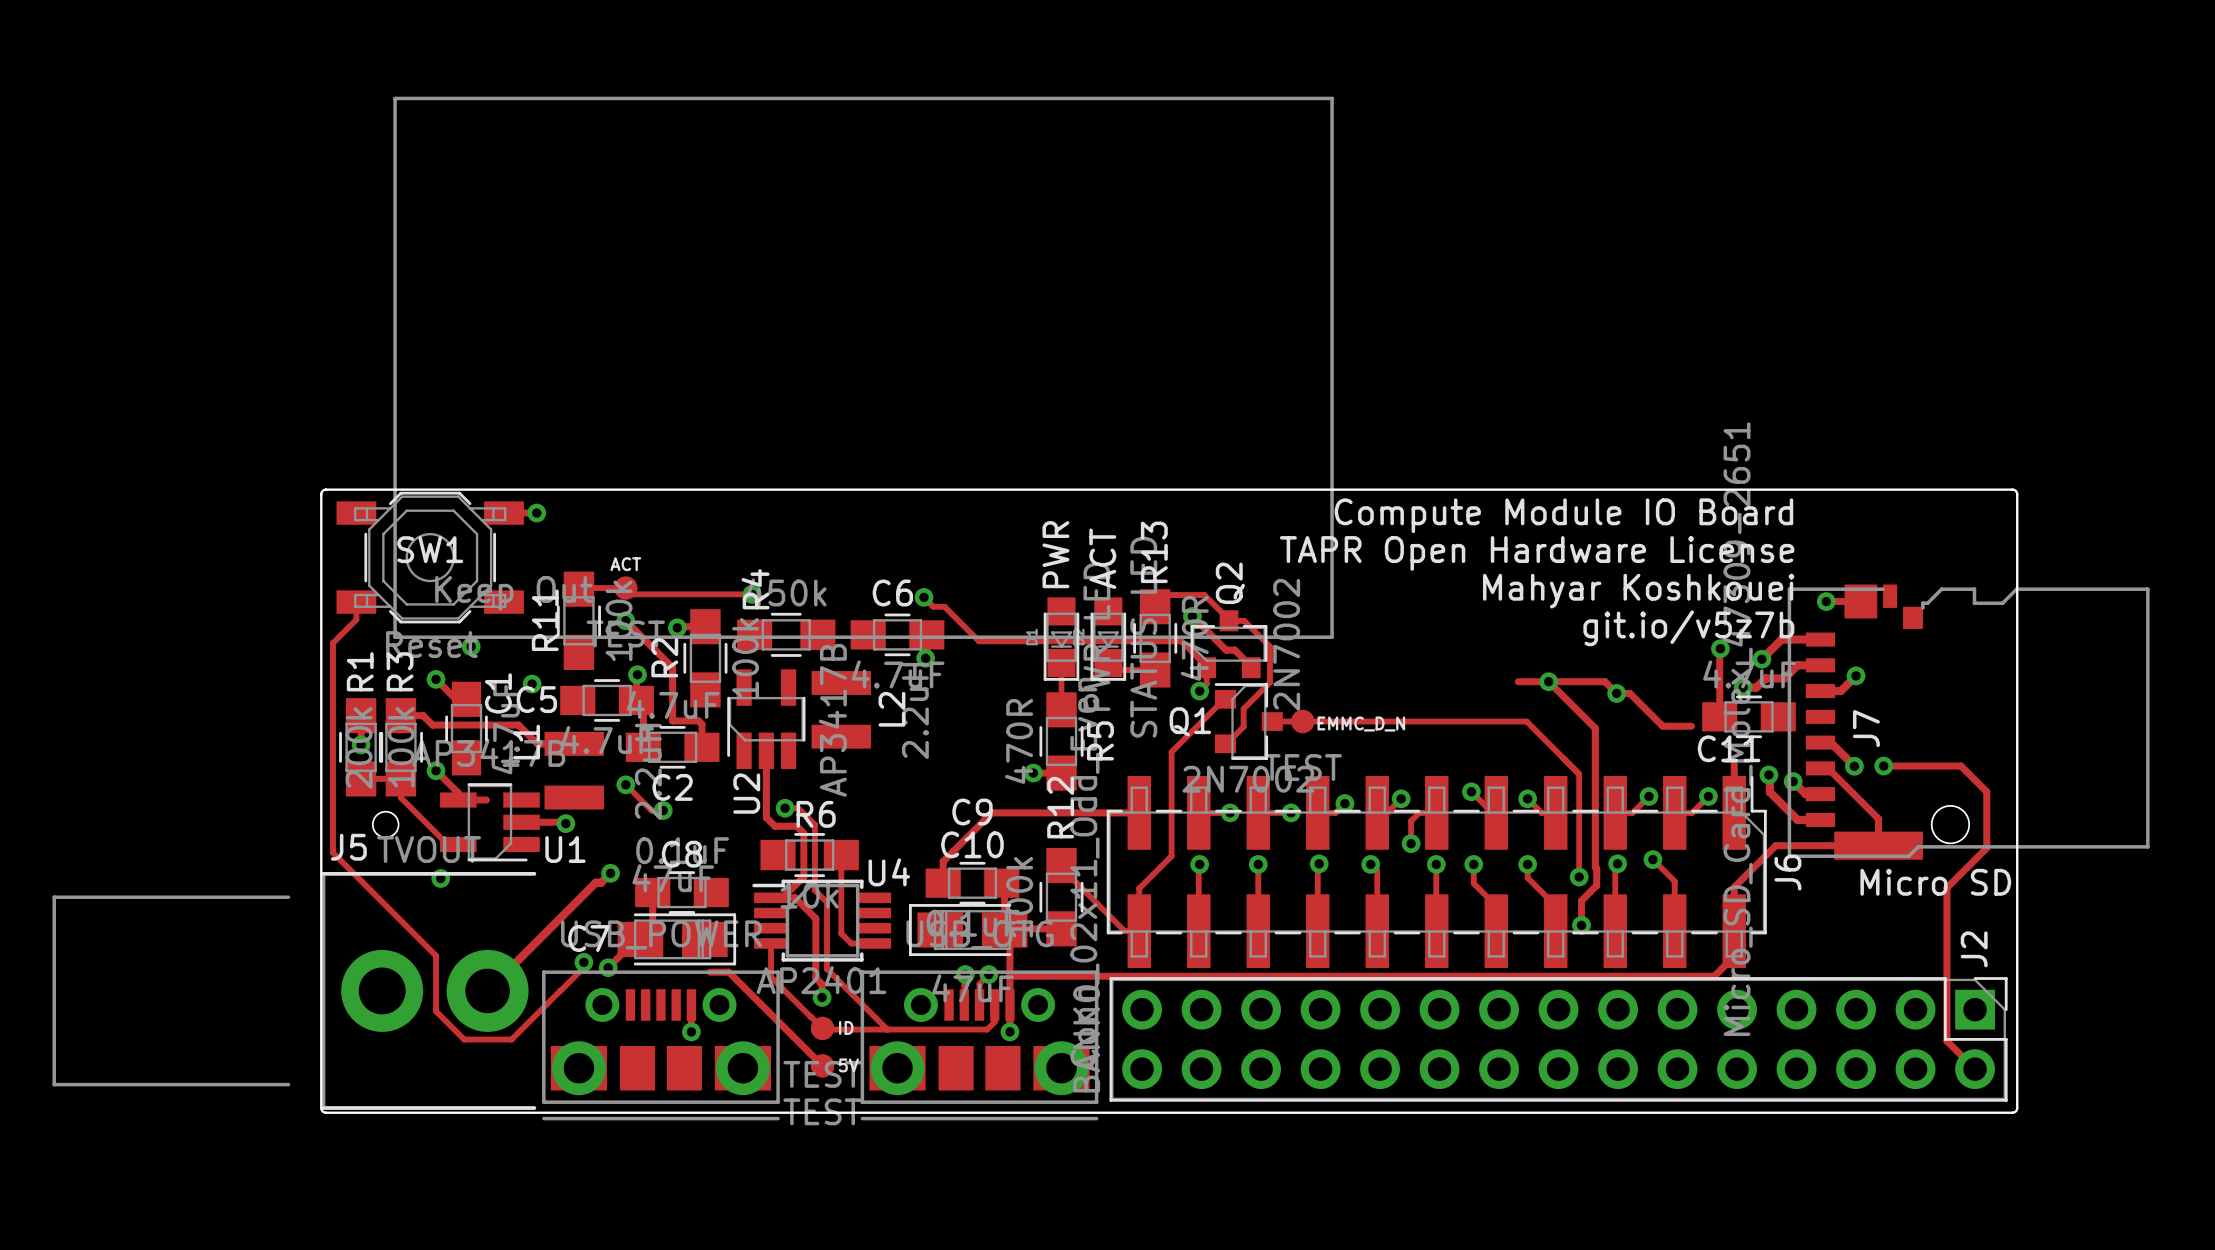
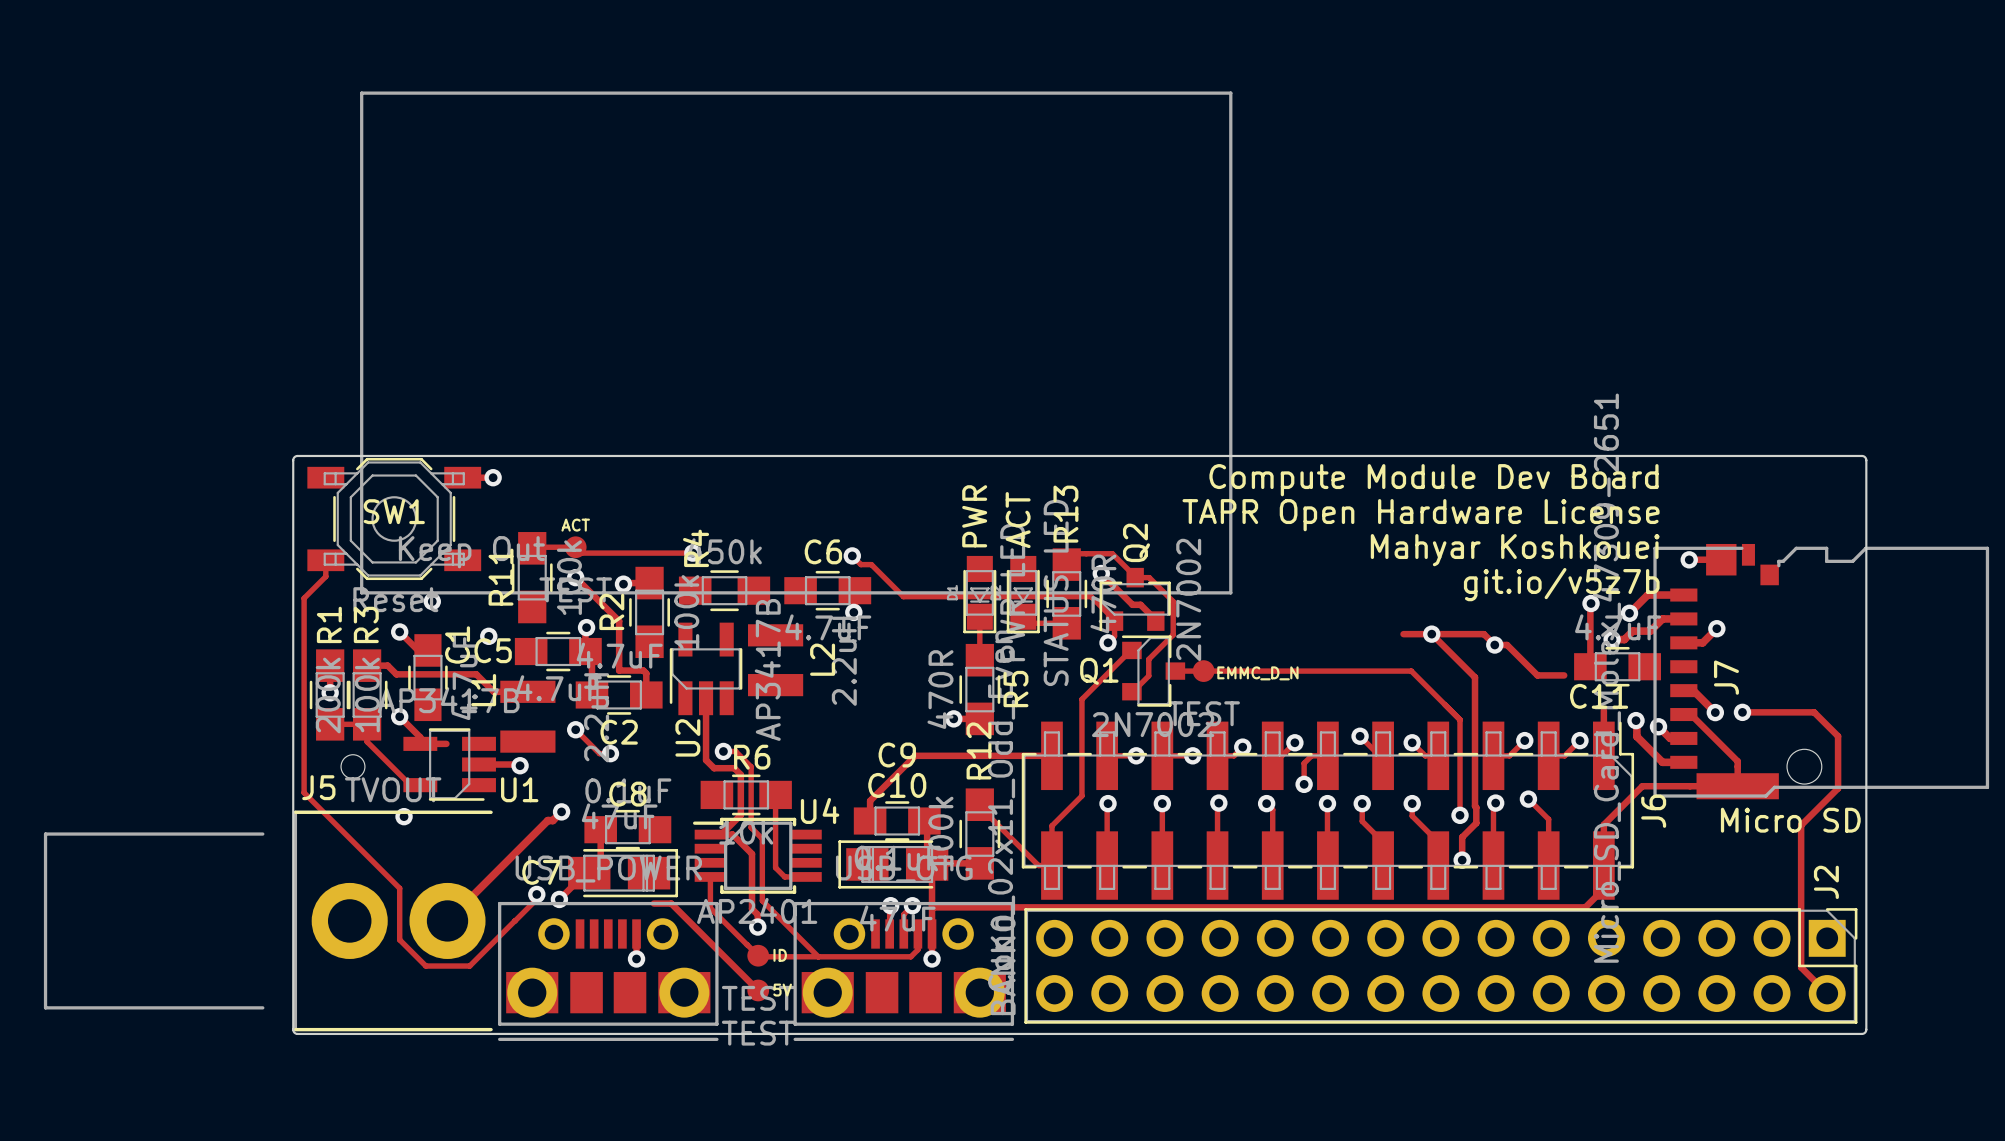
text: Compute Module IO Board (1563, 515) -> Compute Module Dev Board (1433, 480)

